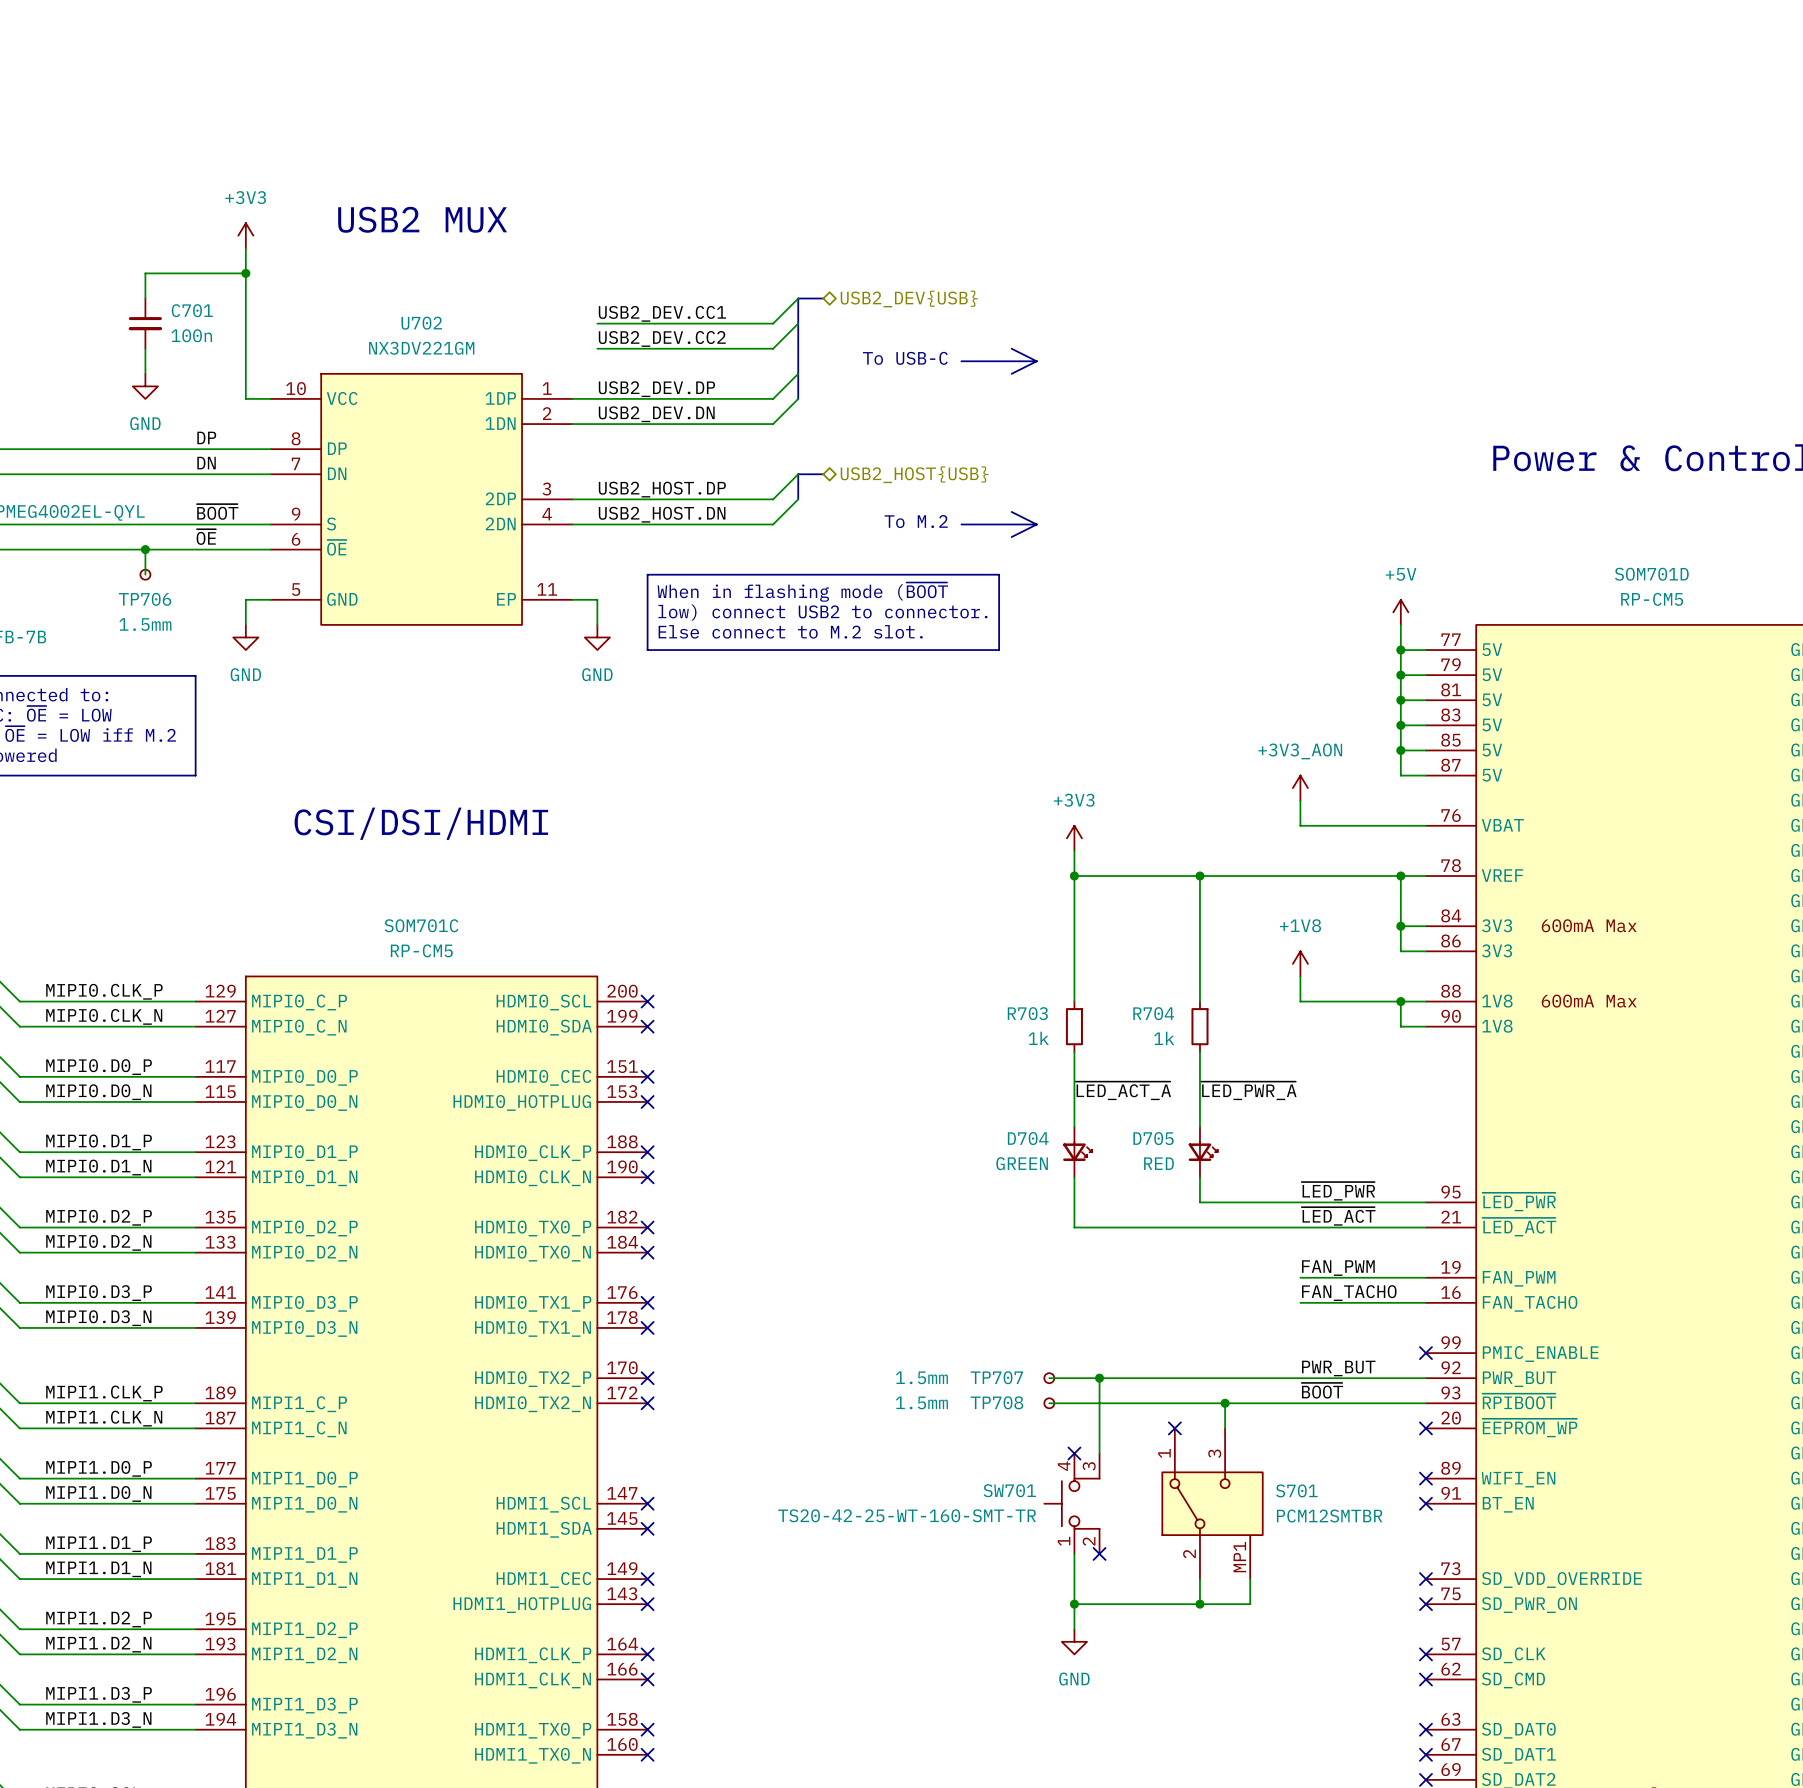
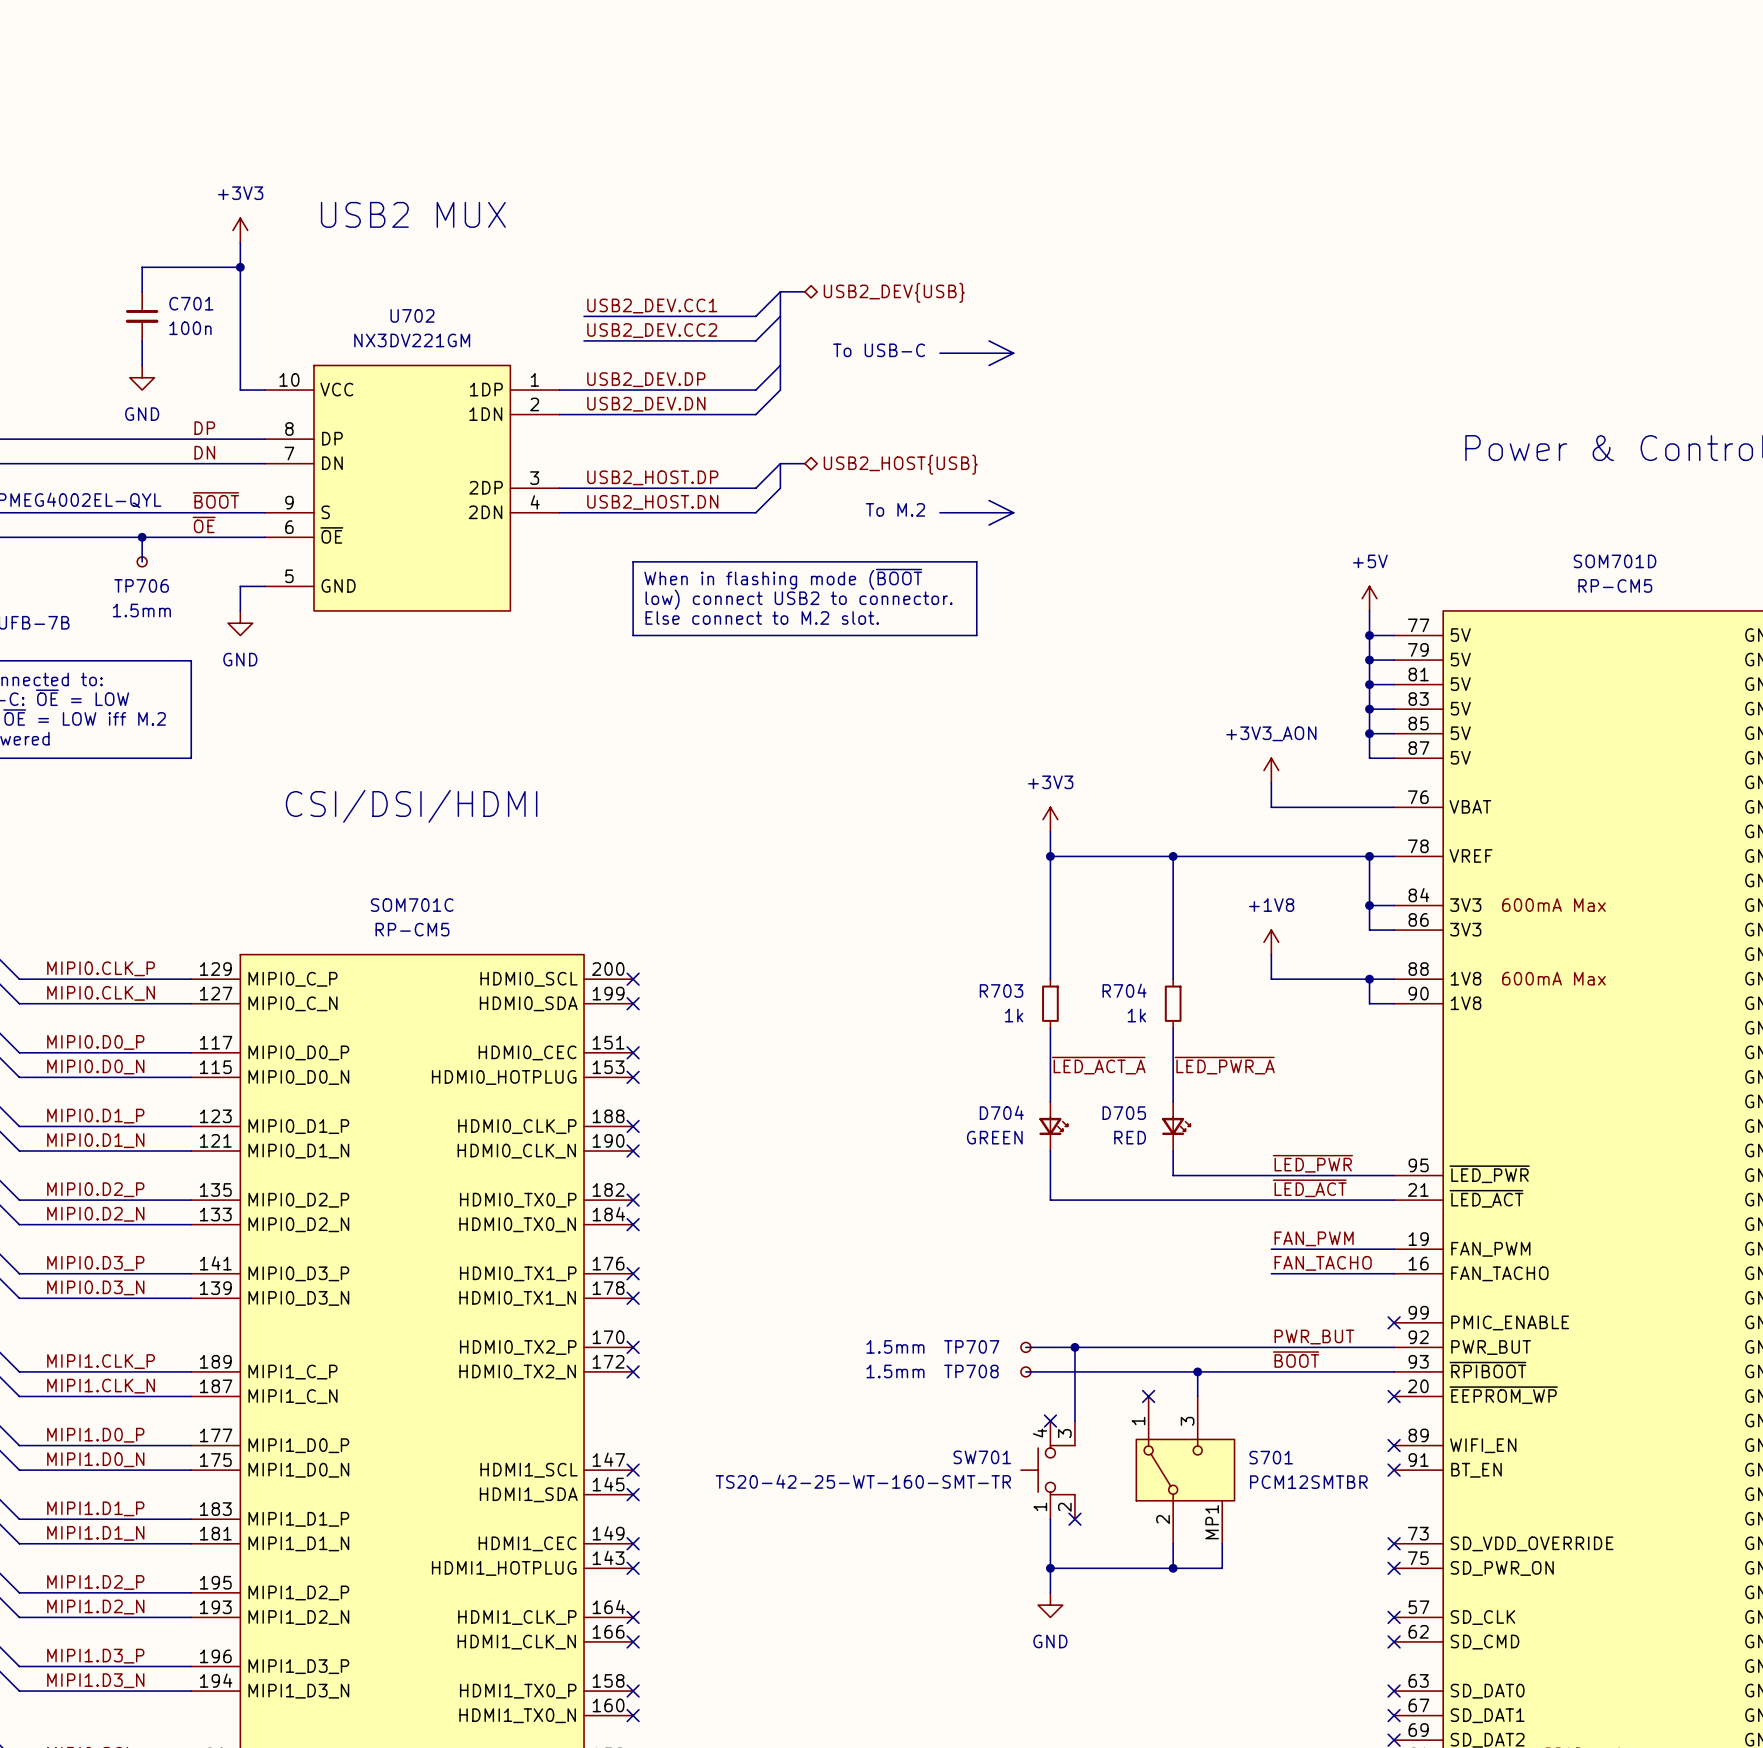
U702 symbol: [270, 373, 573, 625] -> [264, 365, 560, 611]
wire: (572, 599) (597, 599) (597, 624) -> none
power symbol: GND (597, 637) -> none

